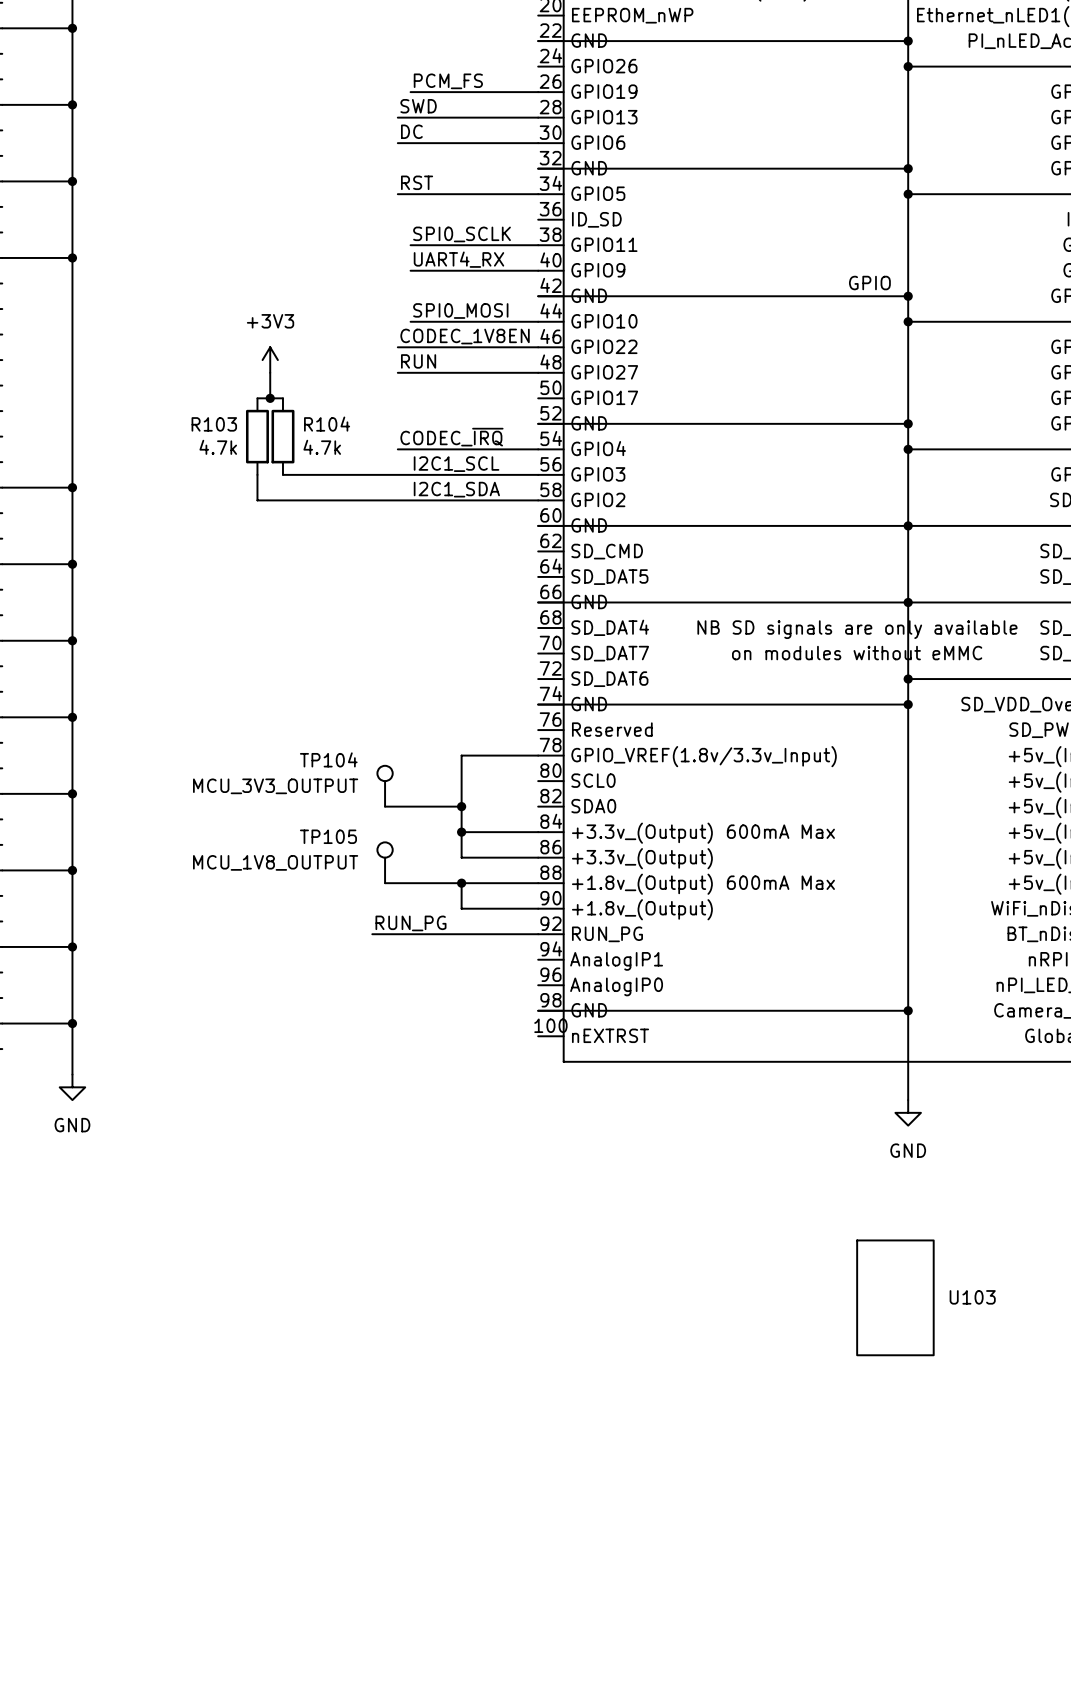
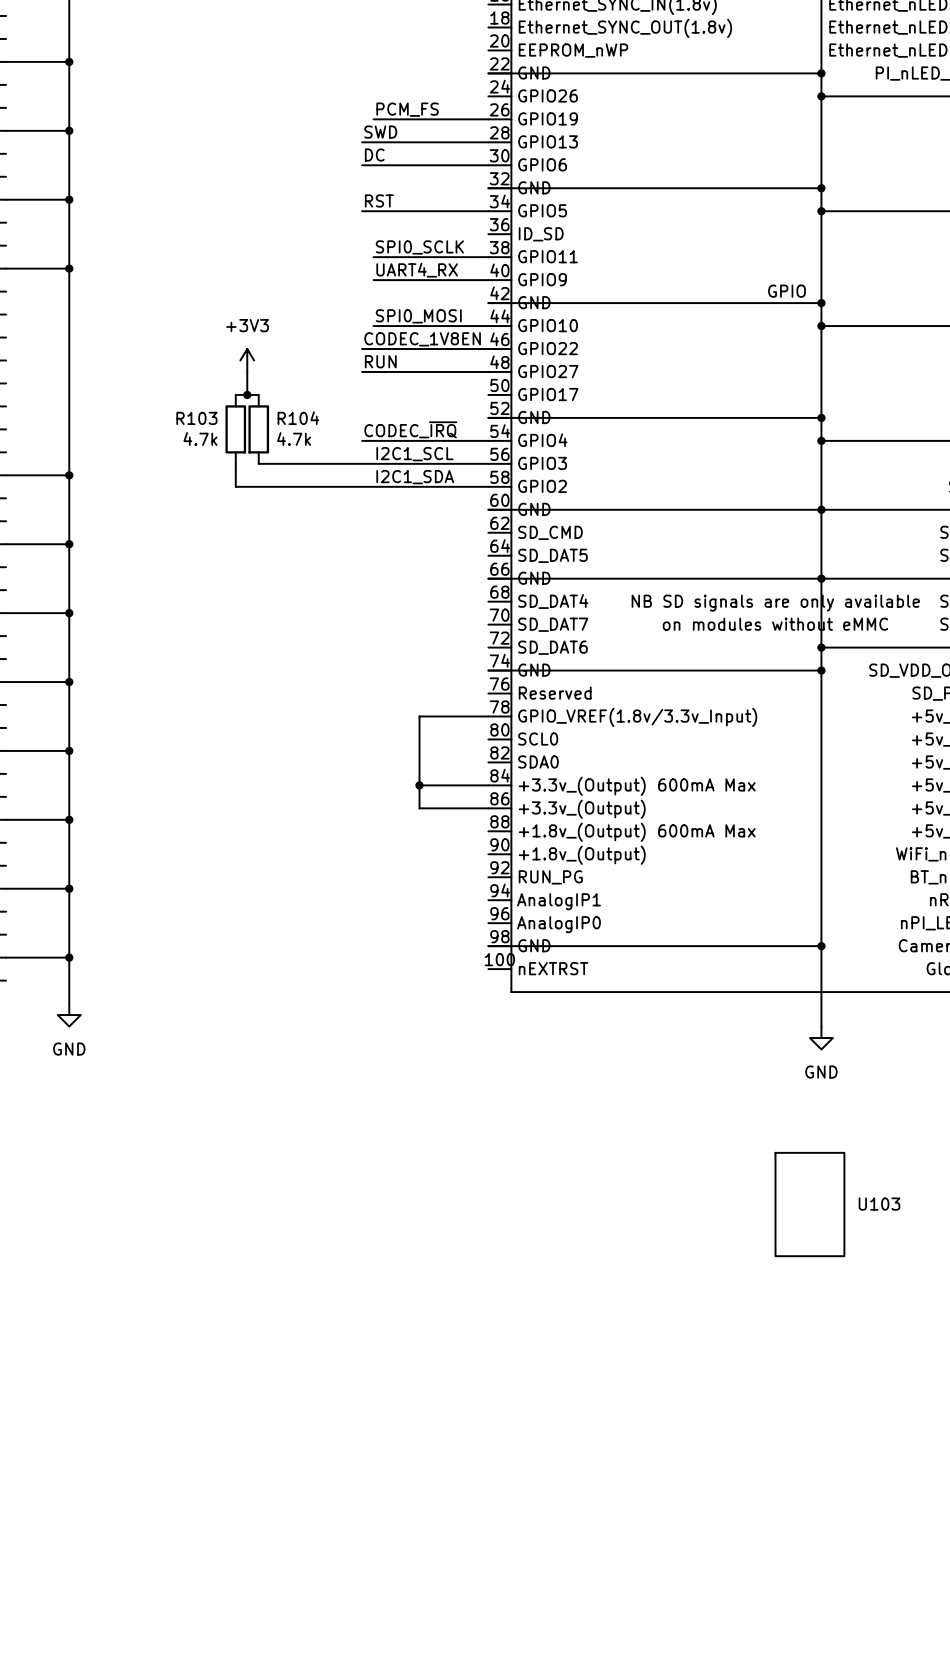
TP104: MCU_3V3_OUTPUT (385, 786) -> none
wire: (385, 806) (461, 806) -> none
junction: (461, 806) -> none
TP105: MCU_1V8_OUTPUT (385, 862) -> none
wire: (385, 883) (538, 883) -> none
wire: (461, 883) (461, 908) (538, 908) -> none
junction: (461, 883) -> none
label: RUN_PG (410, 923) -> none
wire: (372, 934) (538, 934) -> none

